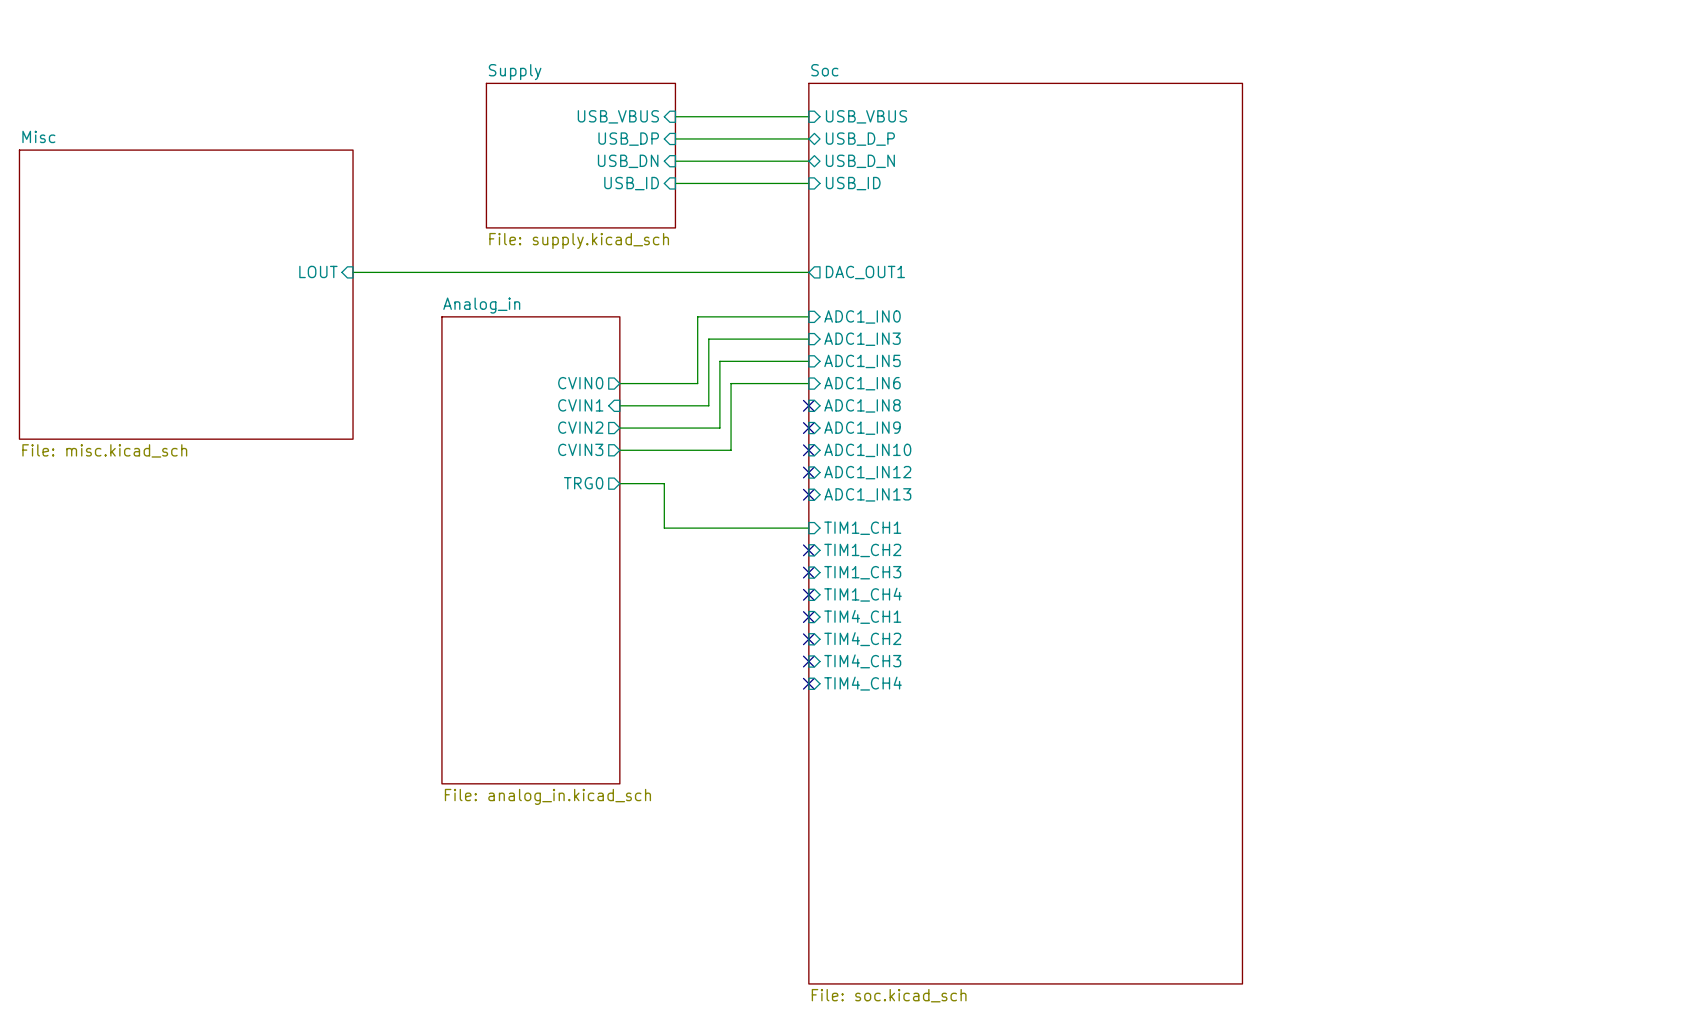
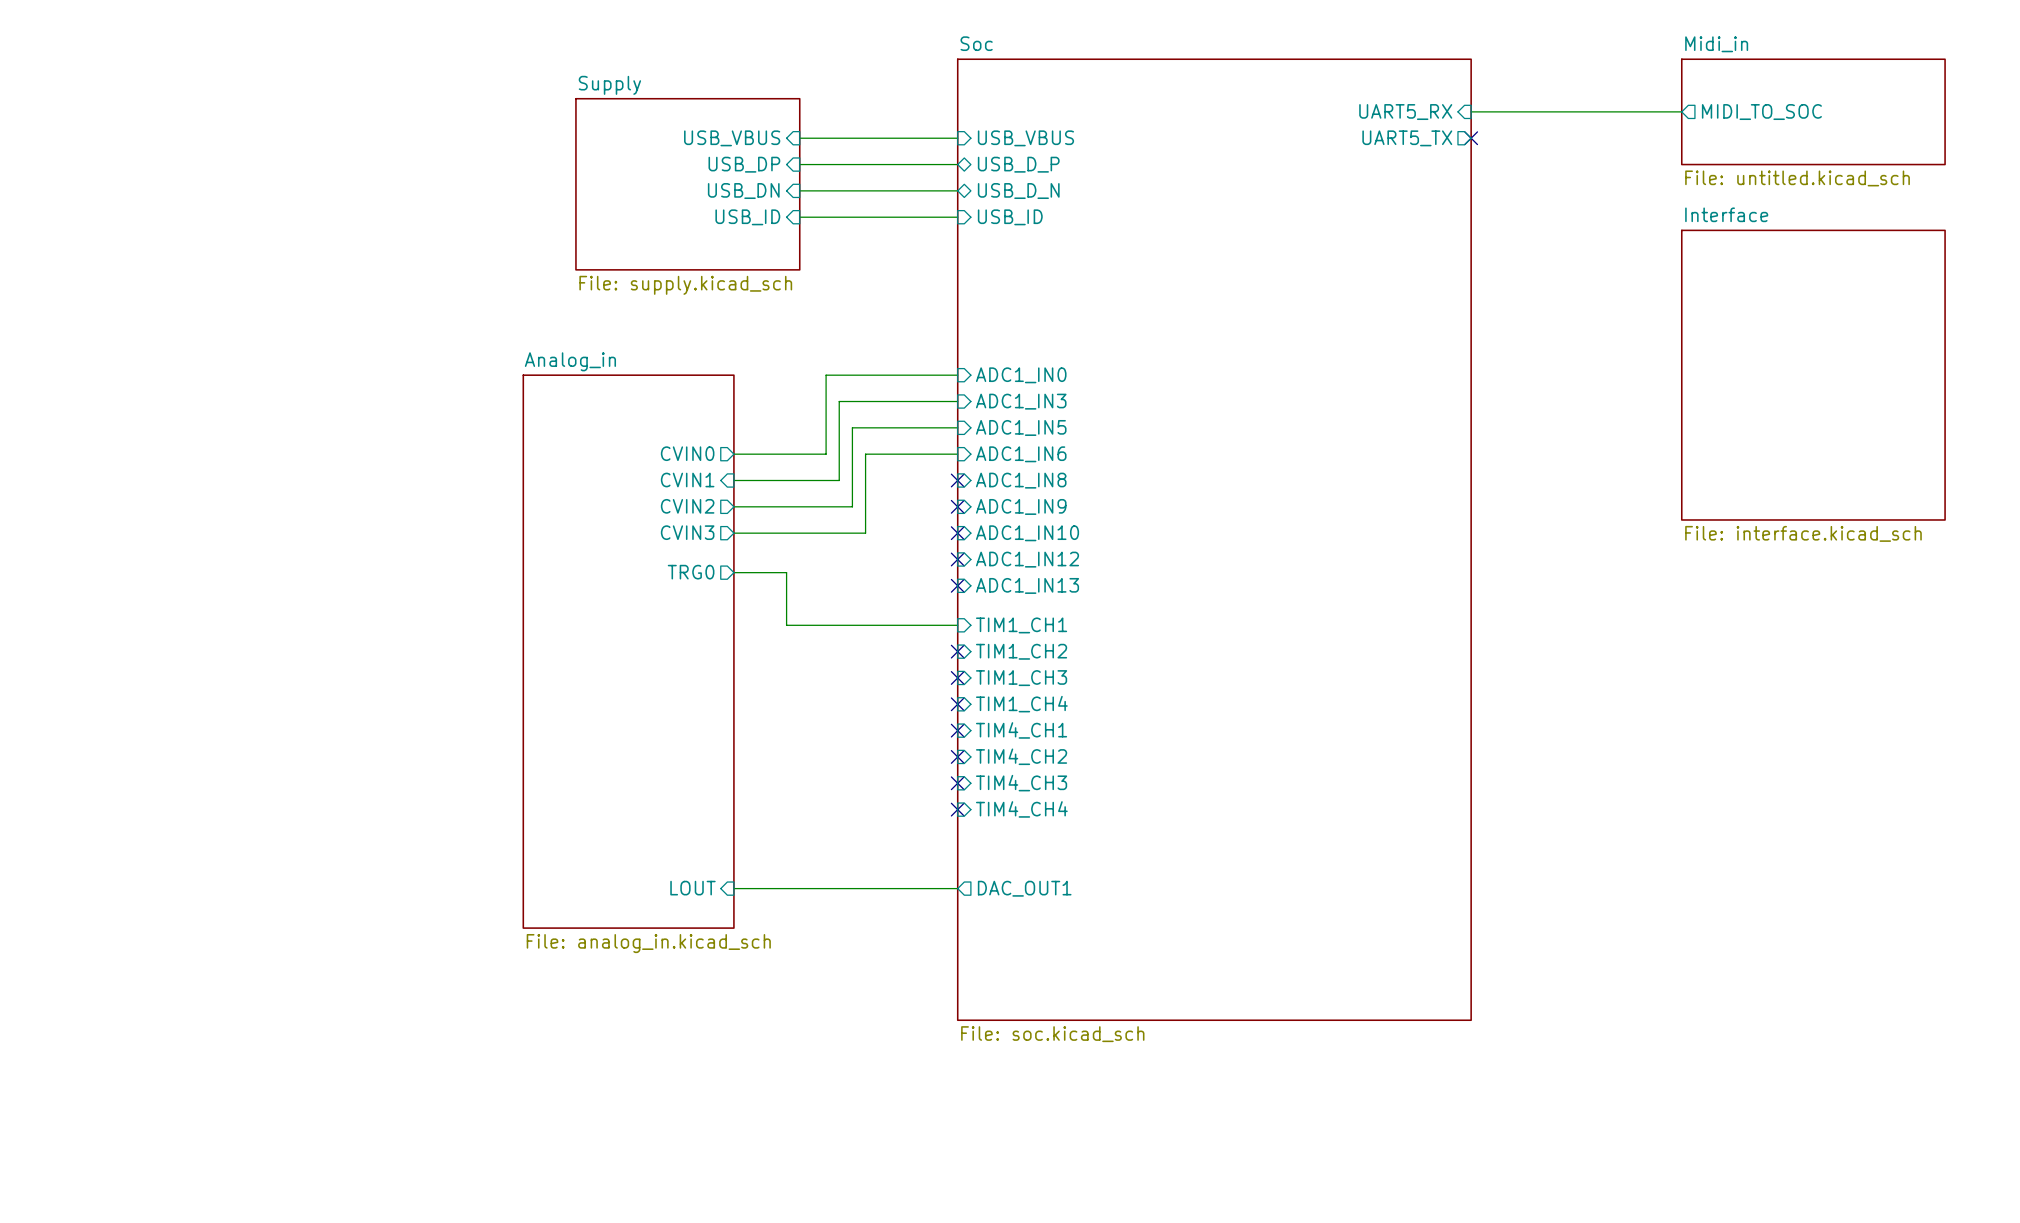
sheet pin: none -> UART5_RX (1405, 112)
wire: none -> (1471, 111) (1681, 111)
sheet pin: none -> MIDI_TO_SOC (1761, 112)
sheet Midi_in: none -> File: untitled.kicad_sch (1813, 111)
sheet pin: none -> UART5_TX (1407, 138)
no-connect mark: none -> (1471, 138)
sheet pin: LOUT (318, 271) -> none
wire: (353, 272) (808, 272) -> none
sheet pin: DAC_OUT1 (865, 272) -> none
sheet Misc: File: misc.kicad_sch (186, 294) -> none
sheet Interface: none -> File: interface.kicad_sch (1813, 375)
sheet Soc: none -> File: soc.kicad_sch (1214, 539)
sheet Soc: File: soc.kicad_sch (1025, 533) -> none
sheet pin: none -> LOUT (692, 888)
wire: none -> (733, 888) (957, 888)
sheet pin: none -> DAC_OUT1 (1024, 888)

